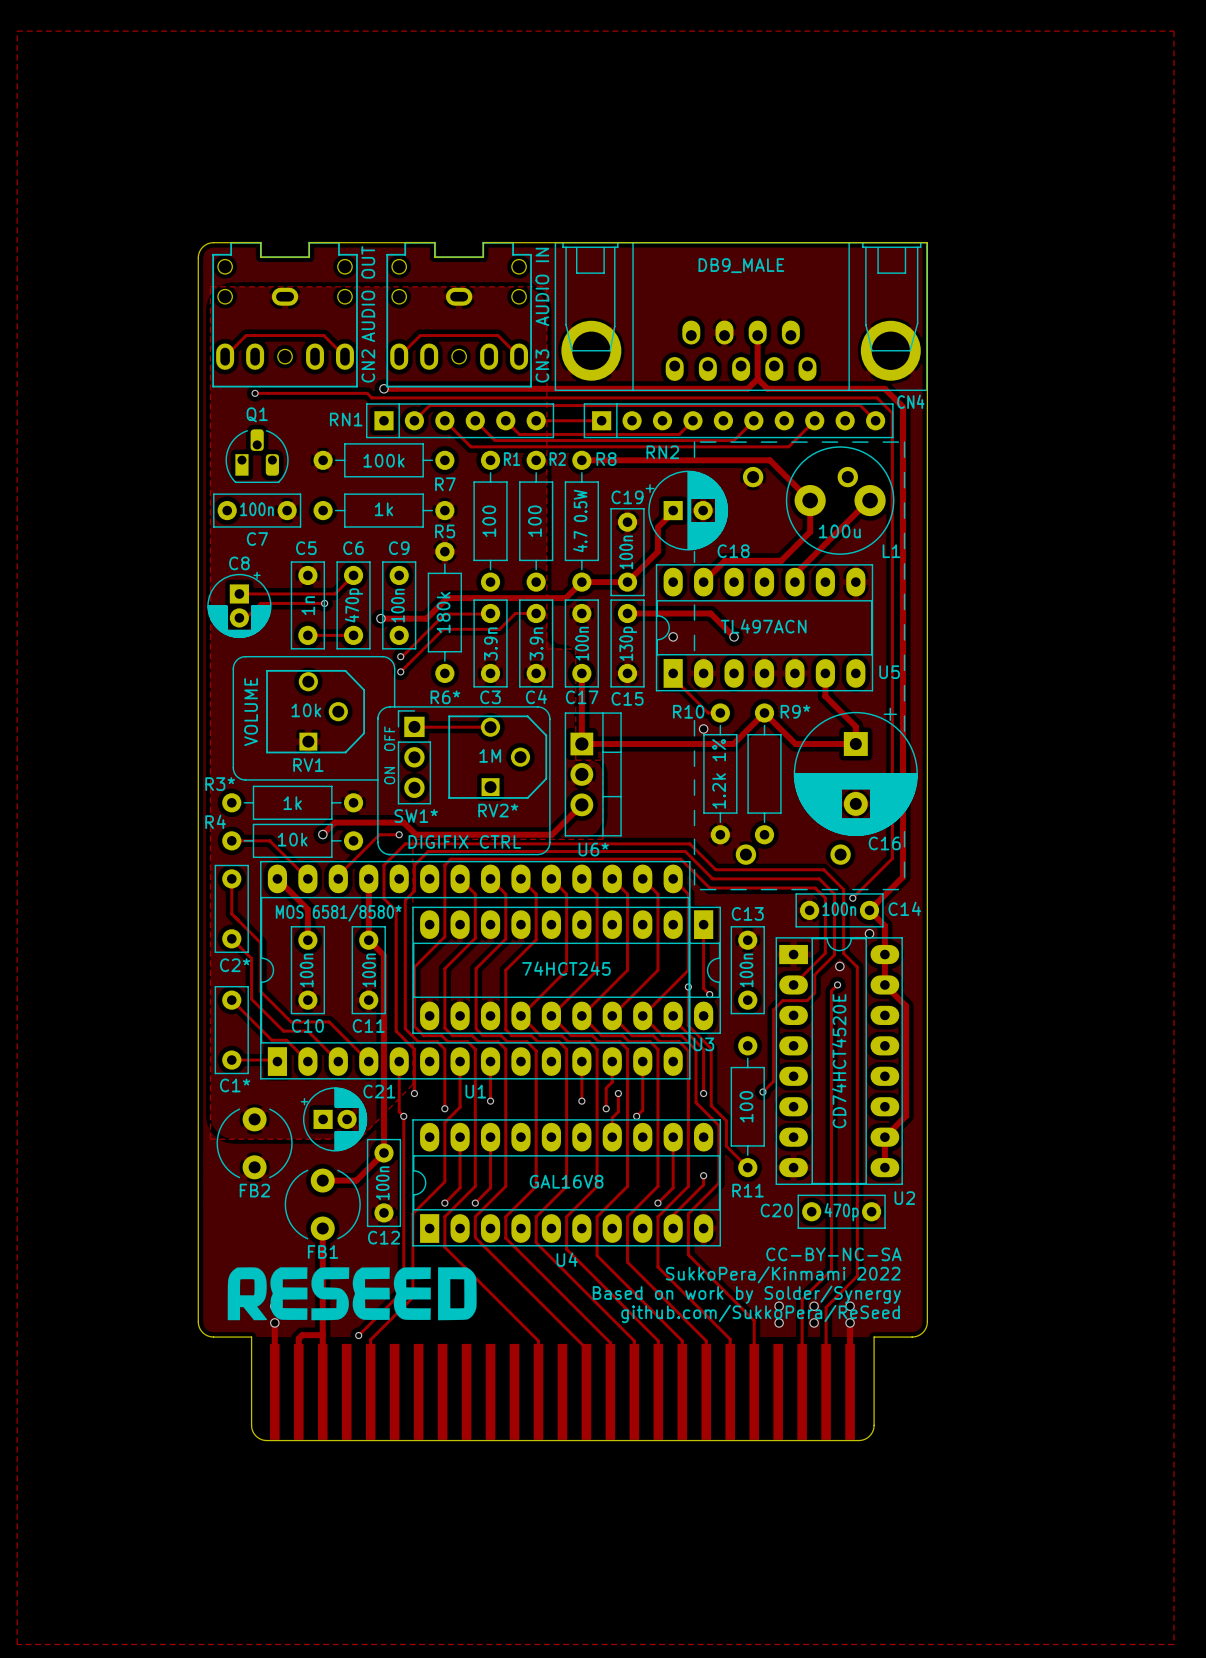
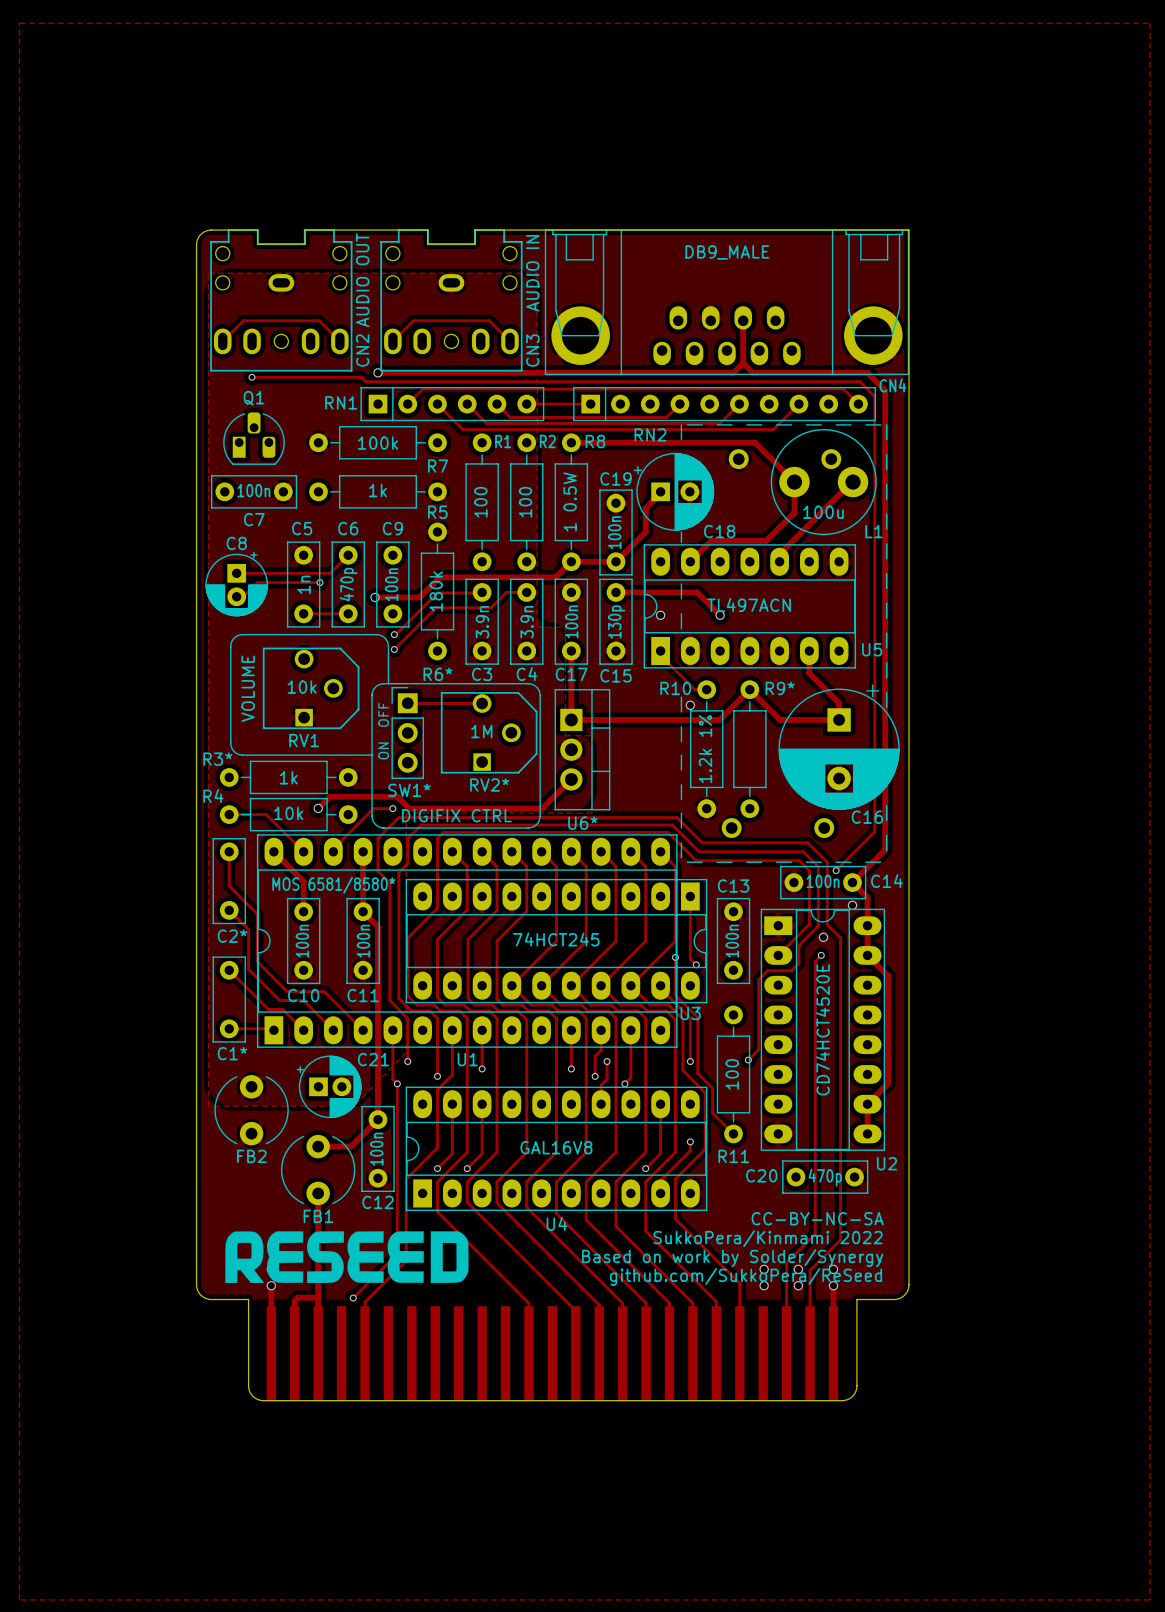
text: 4.7 0.5W (580, 520) -> 1 0.5W (570, 501)

